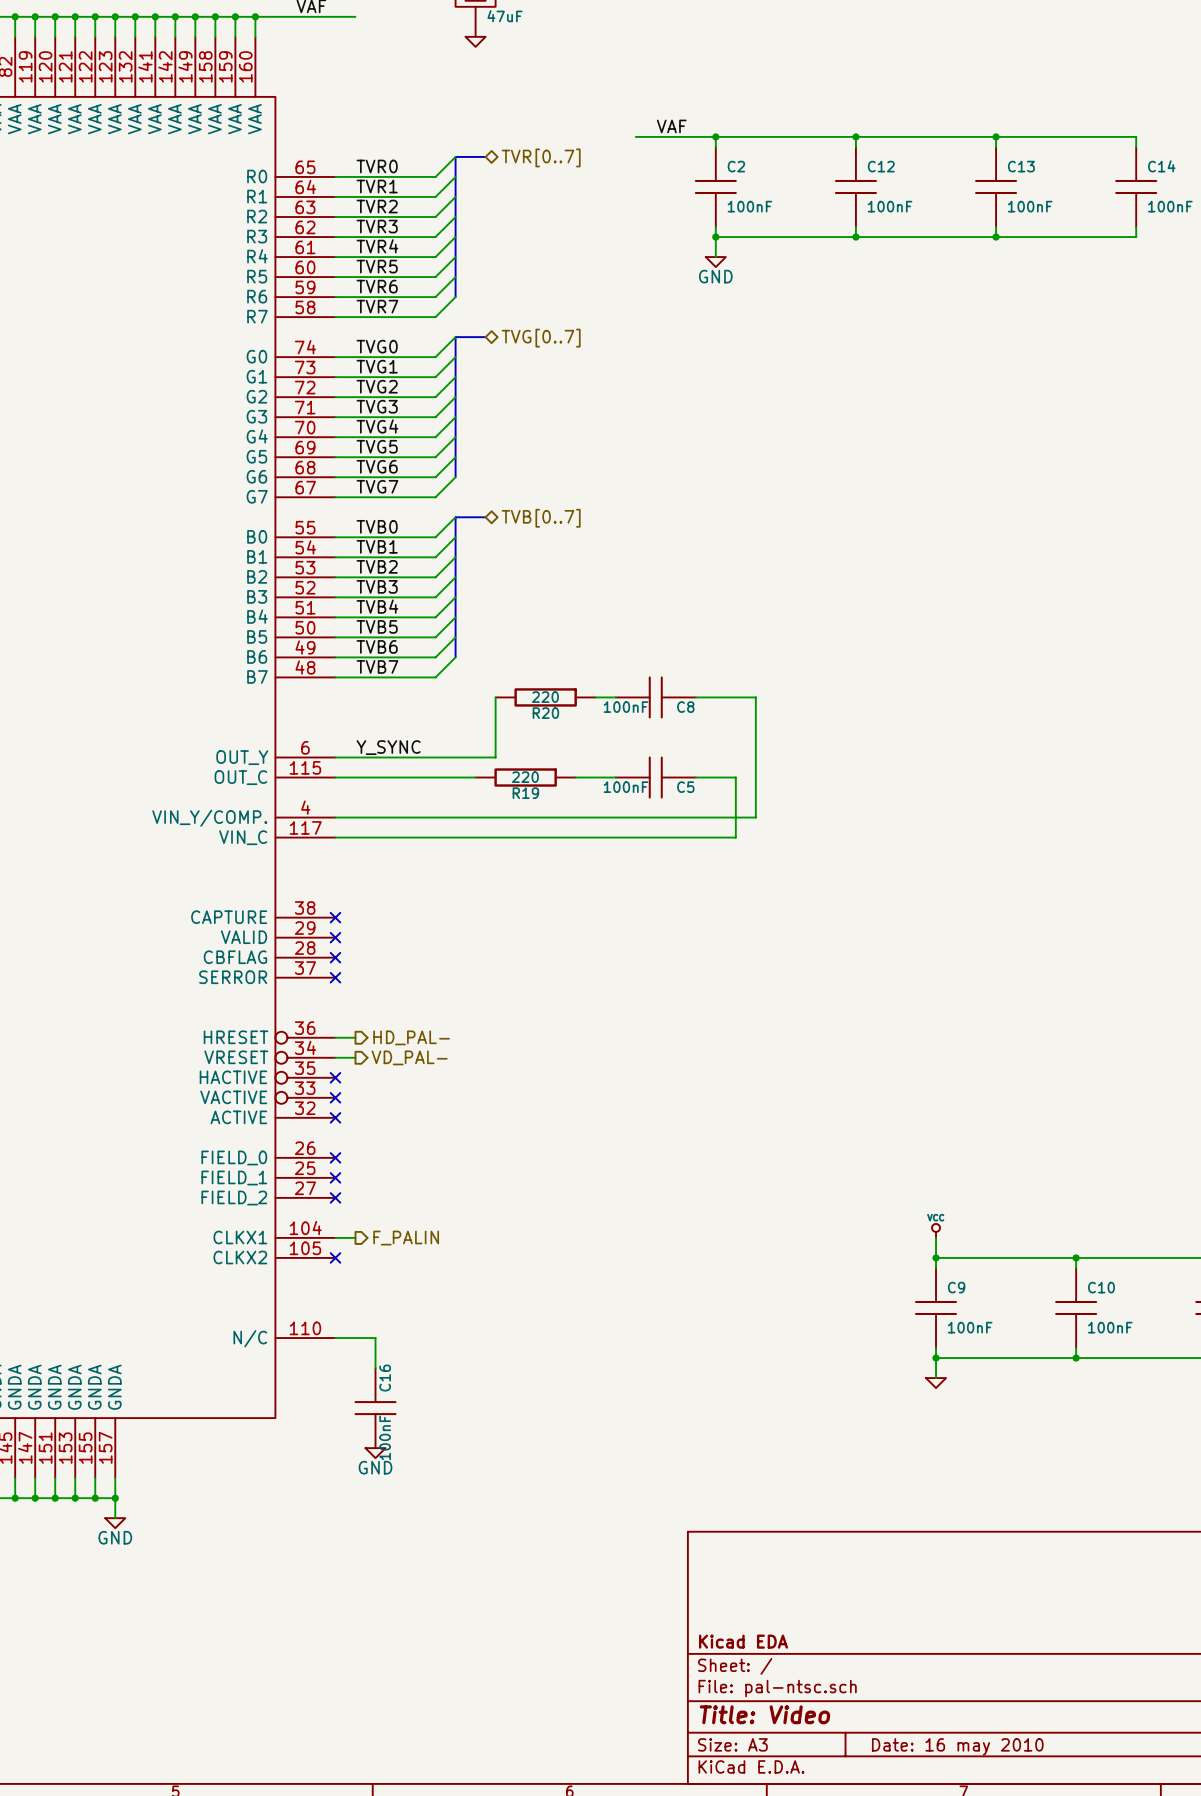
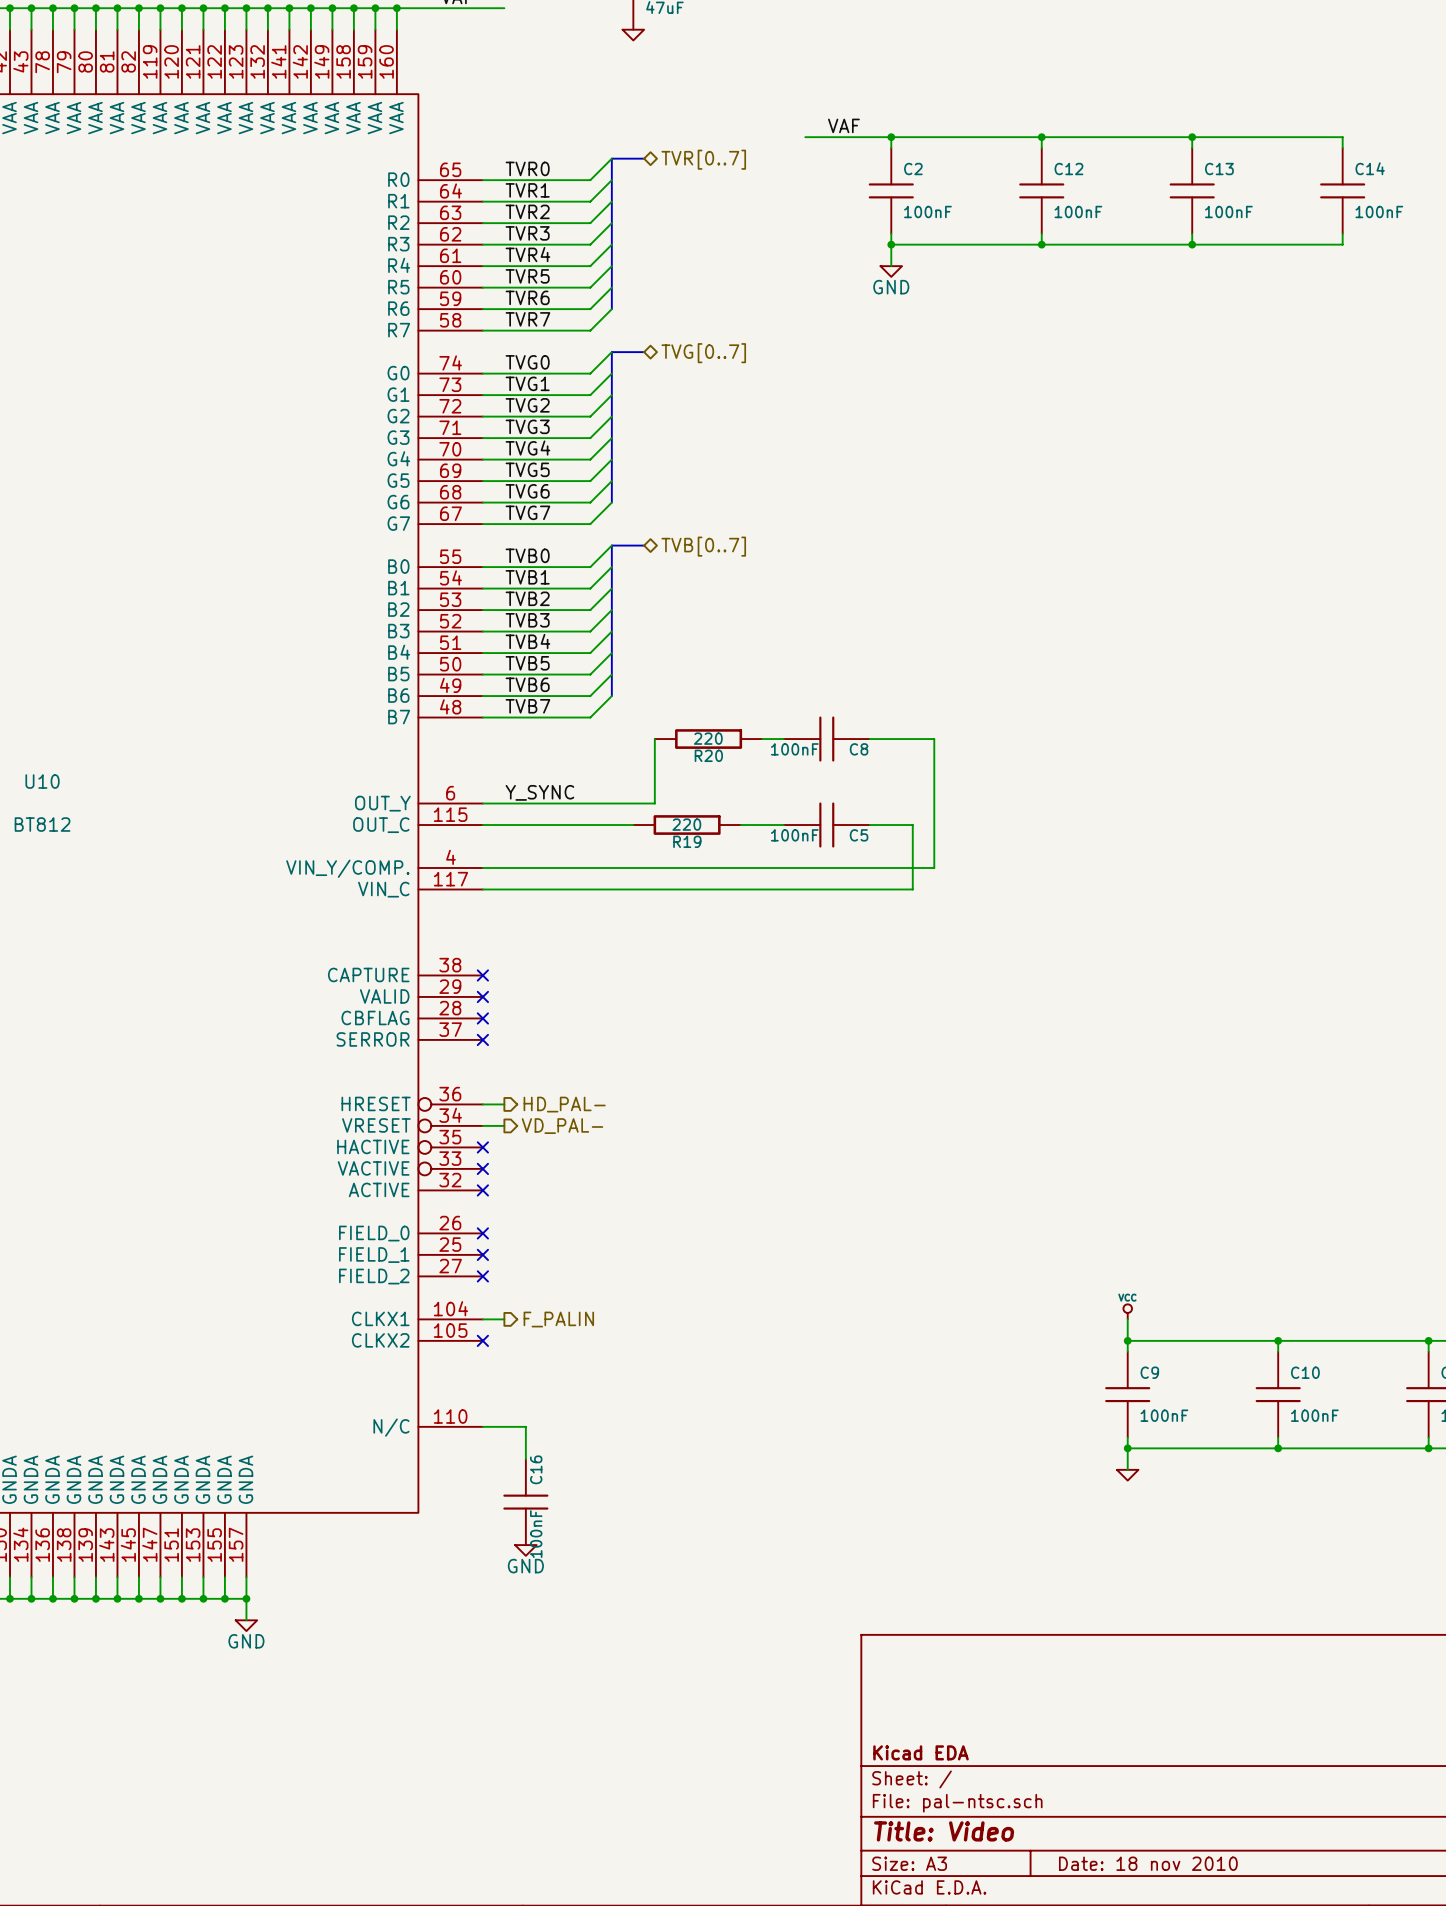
title block: Date: 16 may 2010 (957, 1746) -> Date: 18 nov 2010 (1148, 1863)

